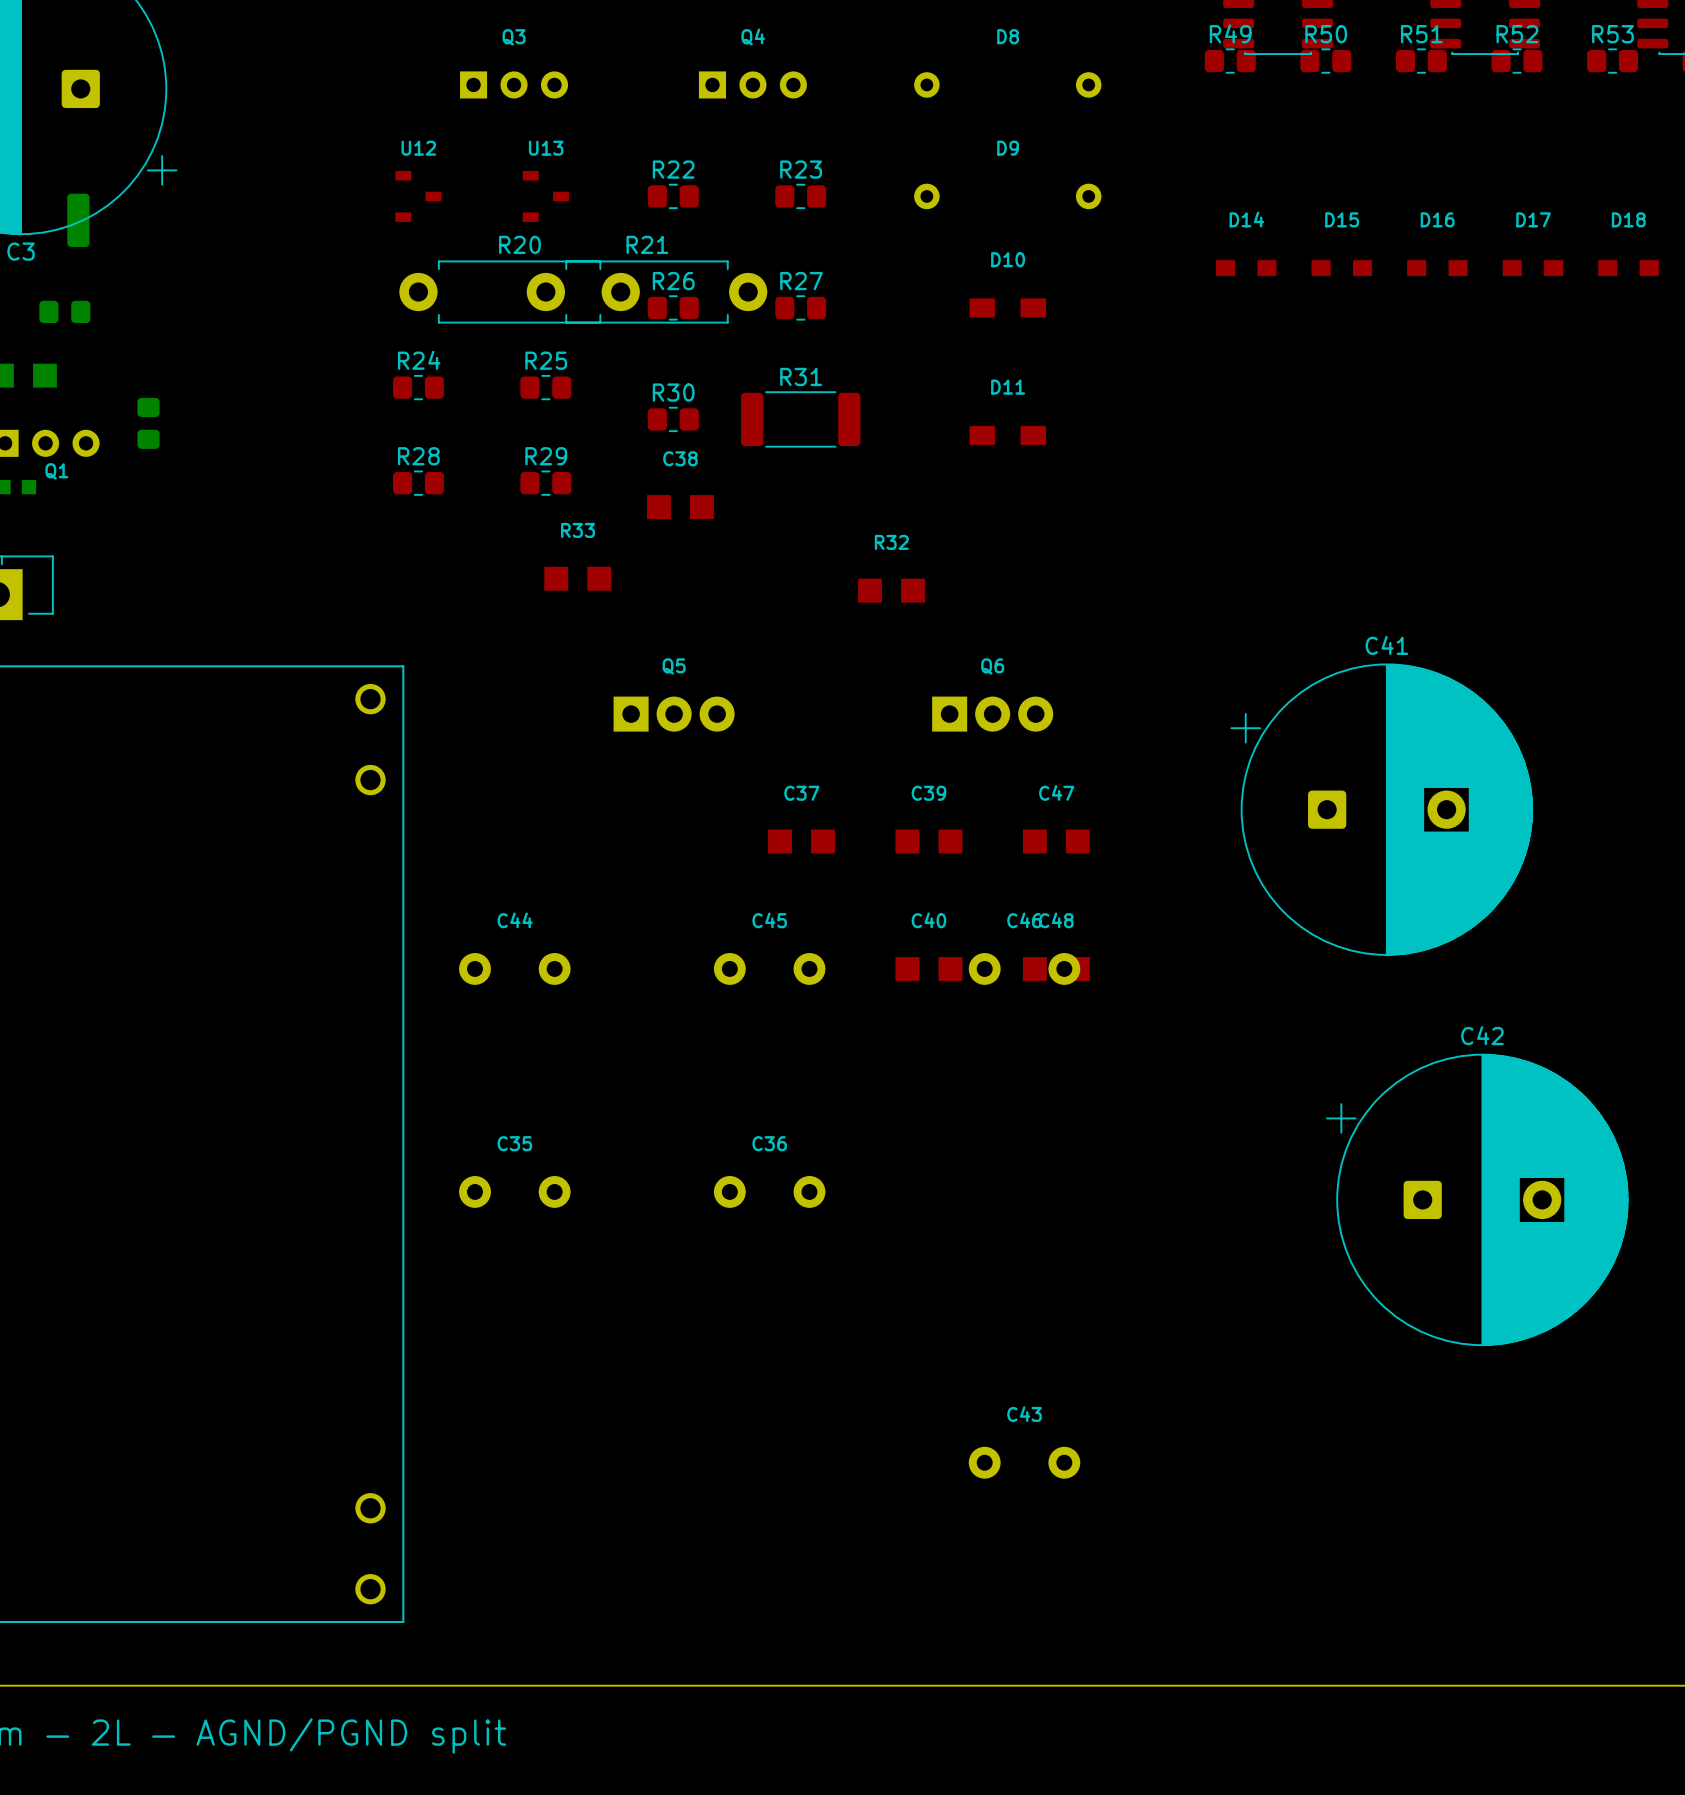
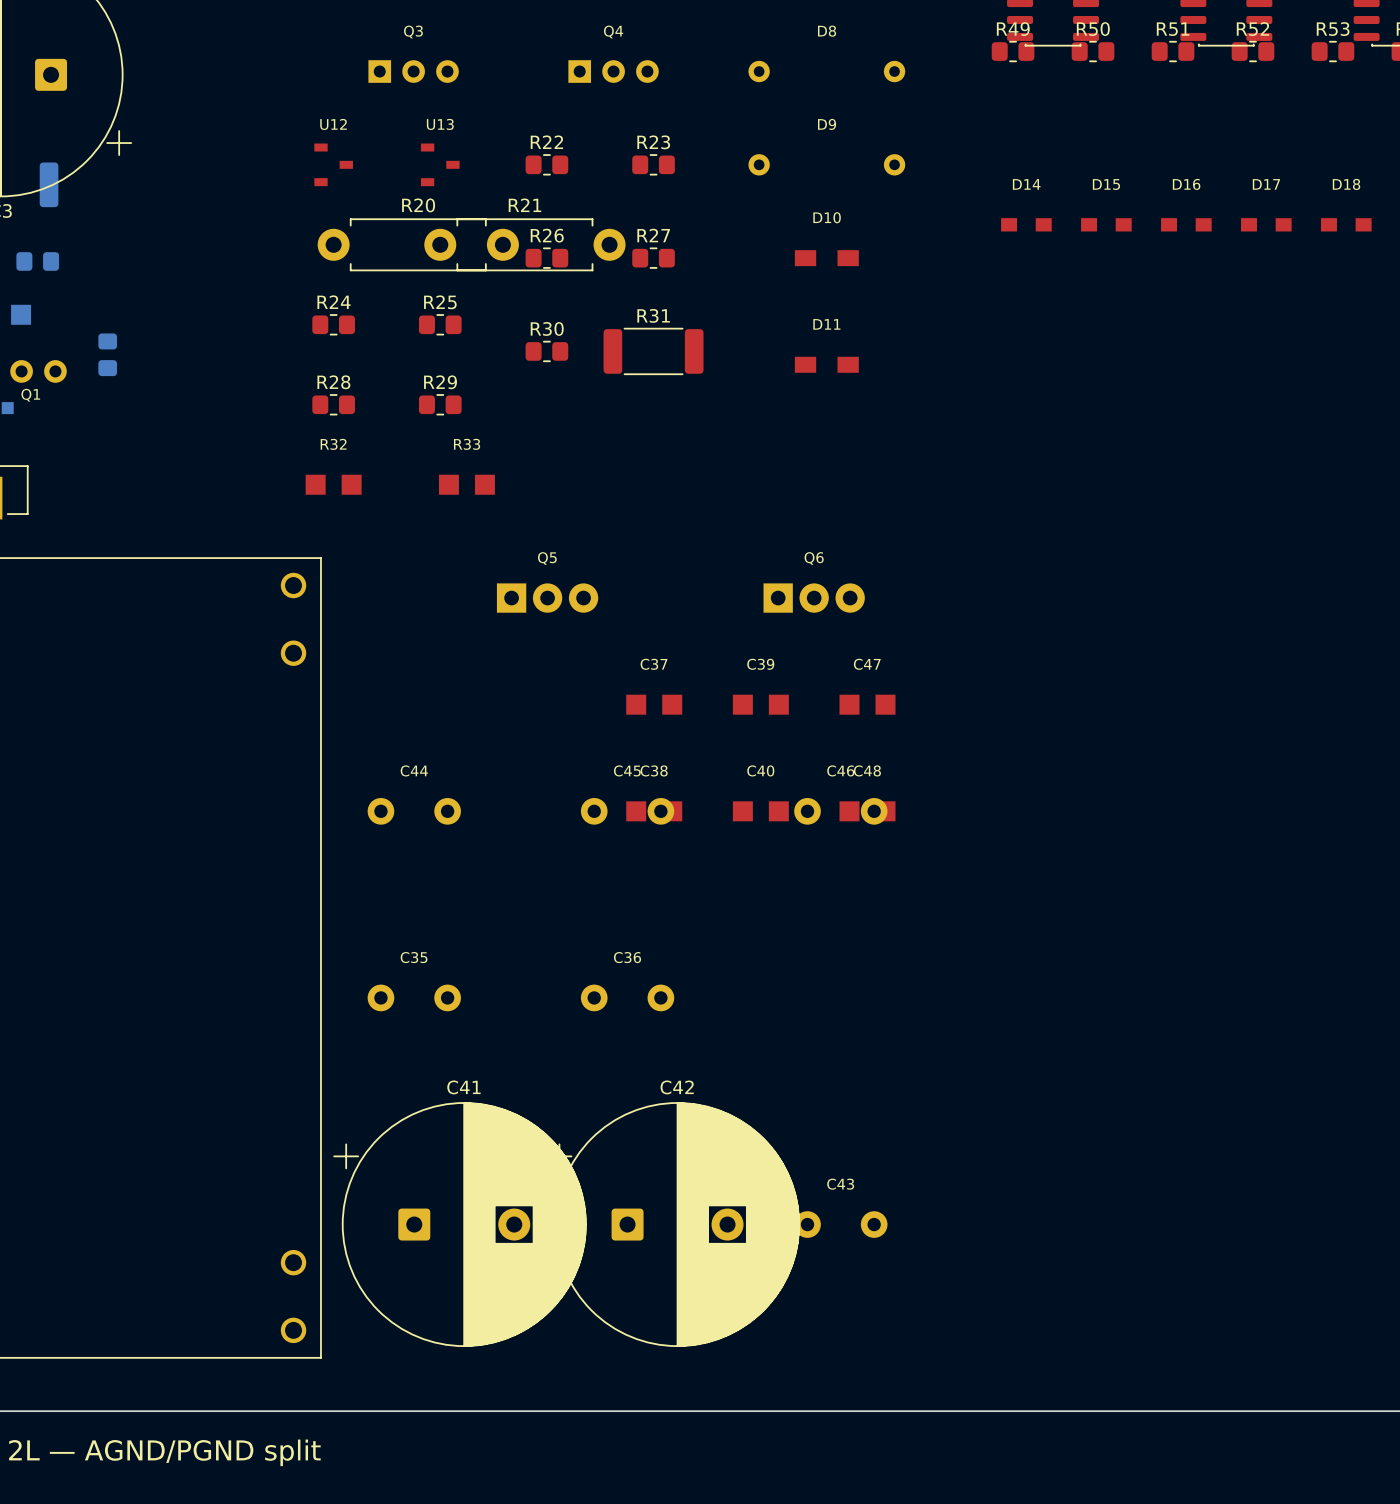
C38 position: (680, 507) -> (654, 811)
R32 position: (891, 590) -> (333, 484)
C41 position: (1381, 809) -> (460, 1224)
C42 position: (1477, 1199) -> (673, 1224)

